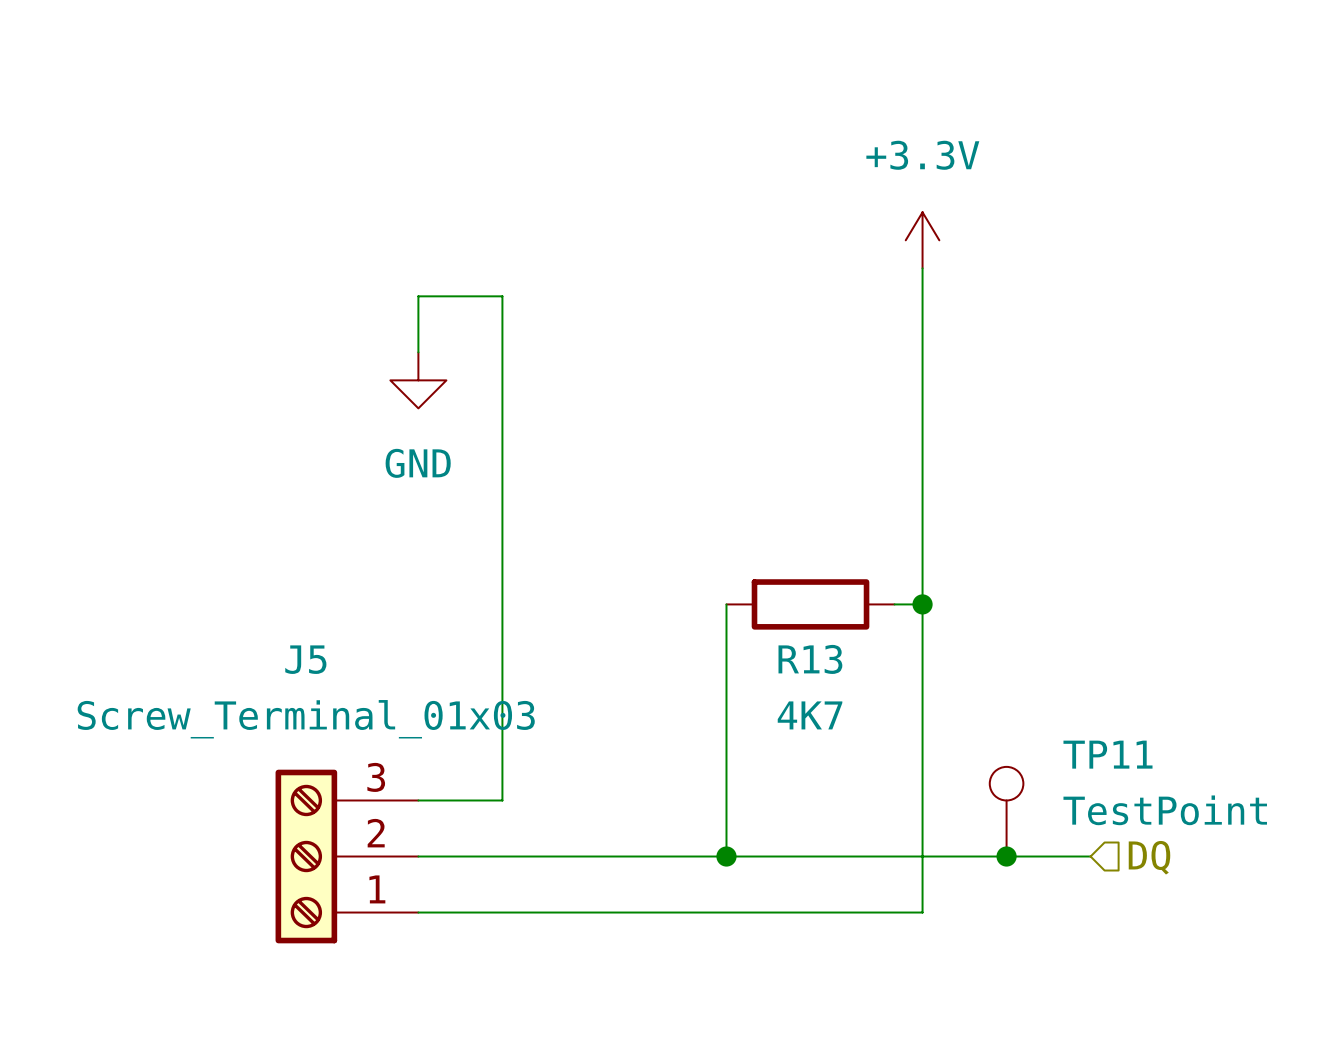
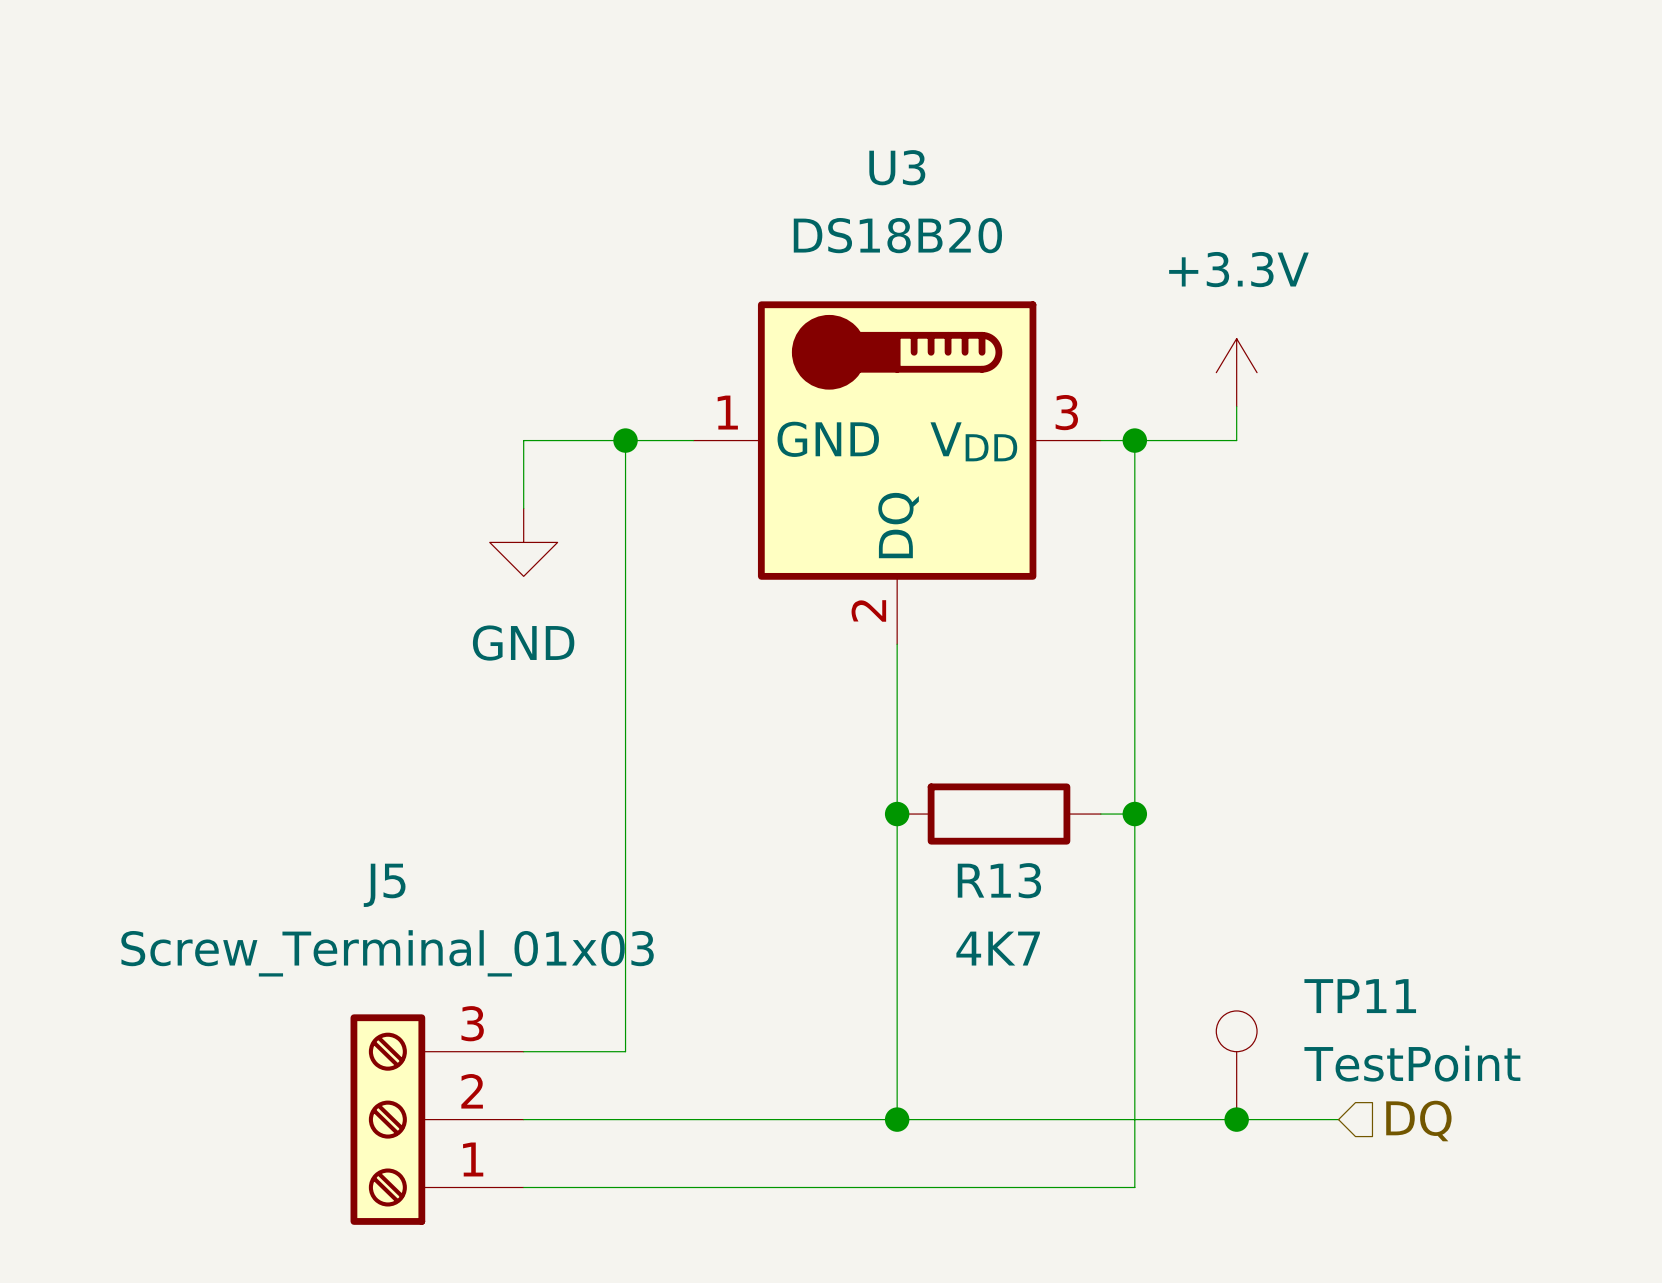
power symbol position: +3.3V (922, 240) -> +3.3V (1236, 372)
wire: (922, 268) (922, 296) -> none
wire: none -> (1236, 406) (1236, 440) (1100, 440)
wire: none -> (625, 440) (693, 440)
junction: none -> (625, 440)
junction: none -> (1134, 440)
U3: none -> DS18B20 (897, 472)
wire: none -> (897, 644) (897, 814)
junction: none -> (897, 814)

